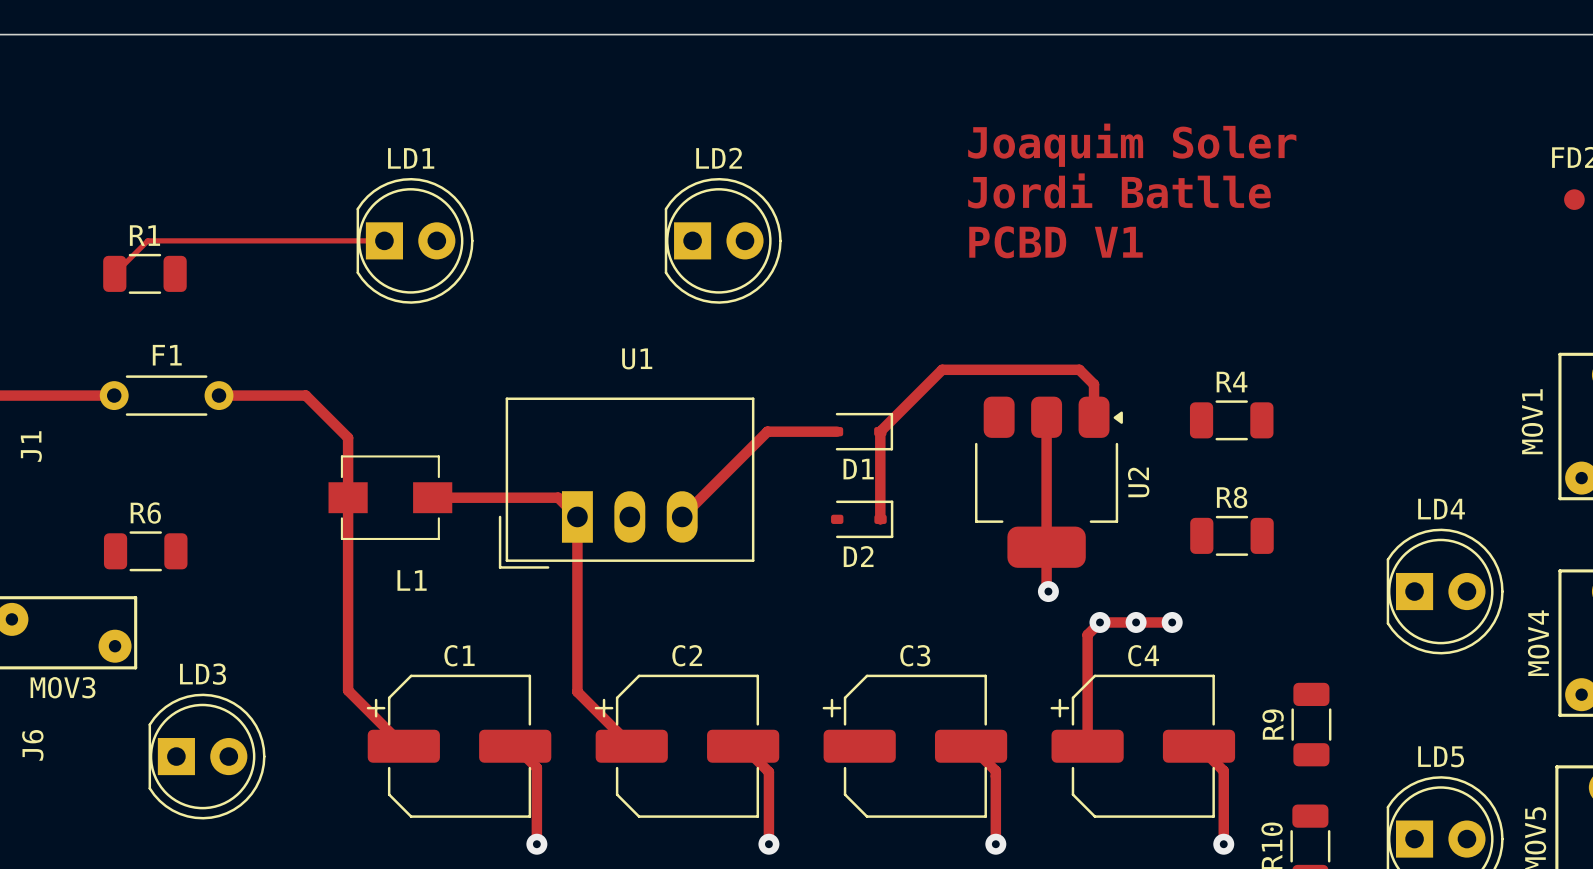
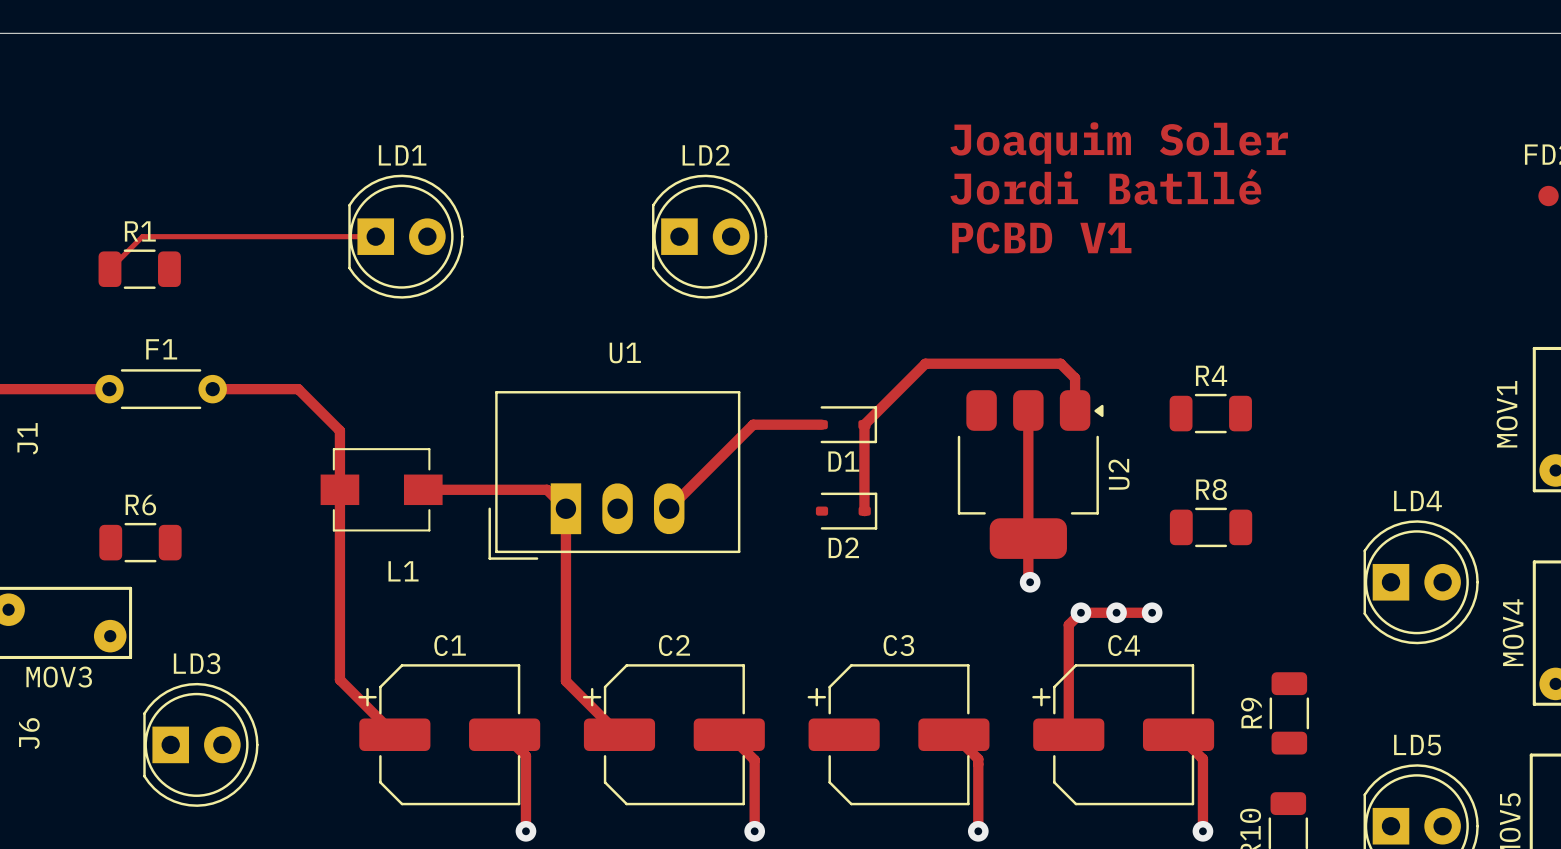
text: Jordi Batlle (1119, 190) -> Jordi Batllé (1105, 186)

